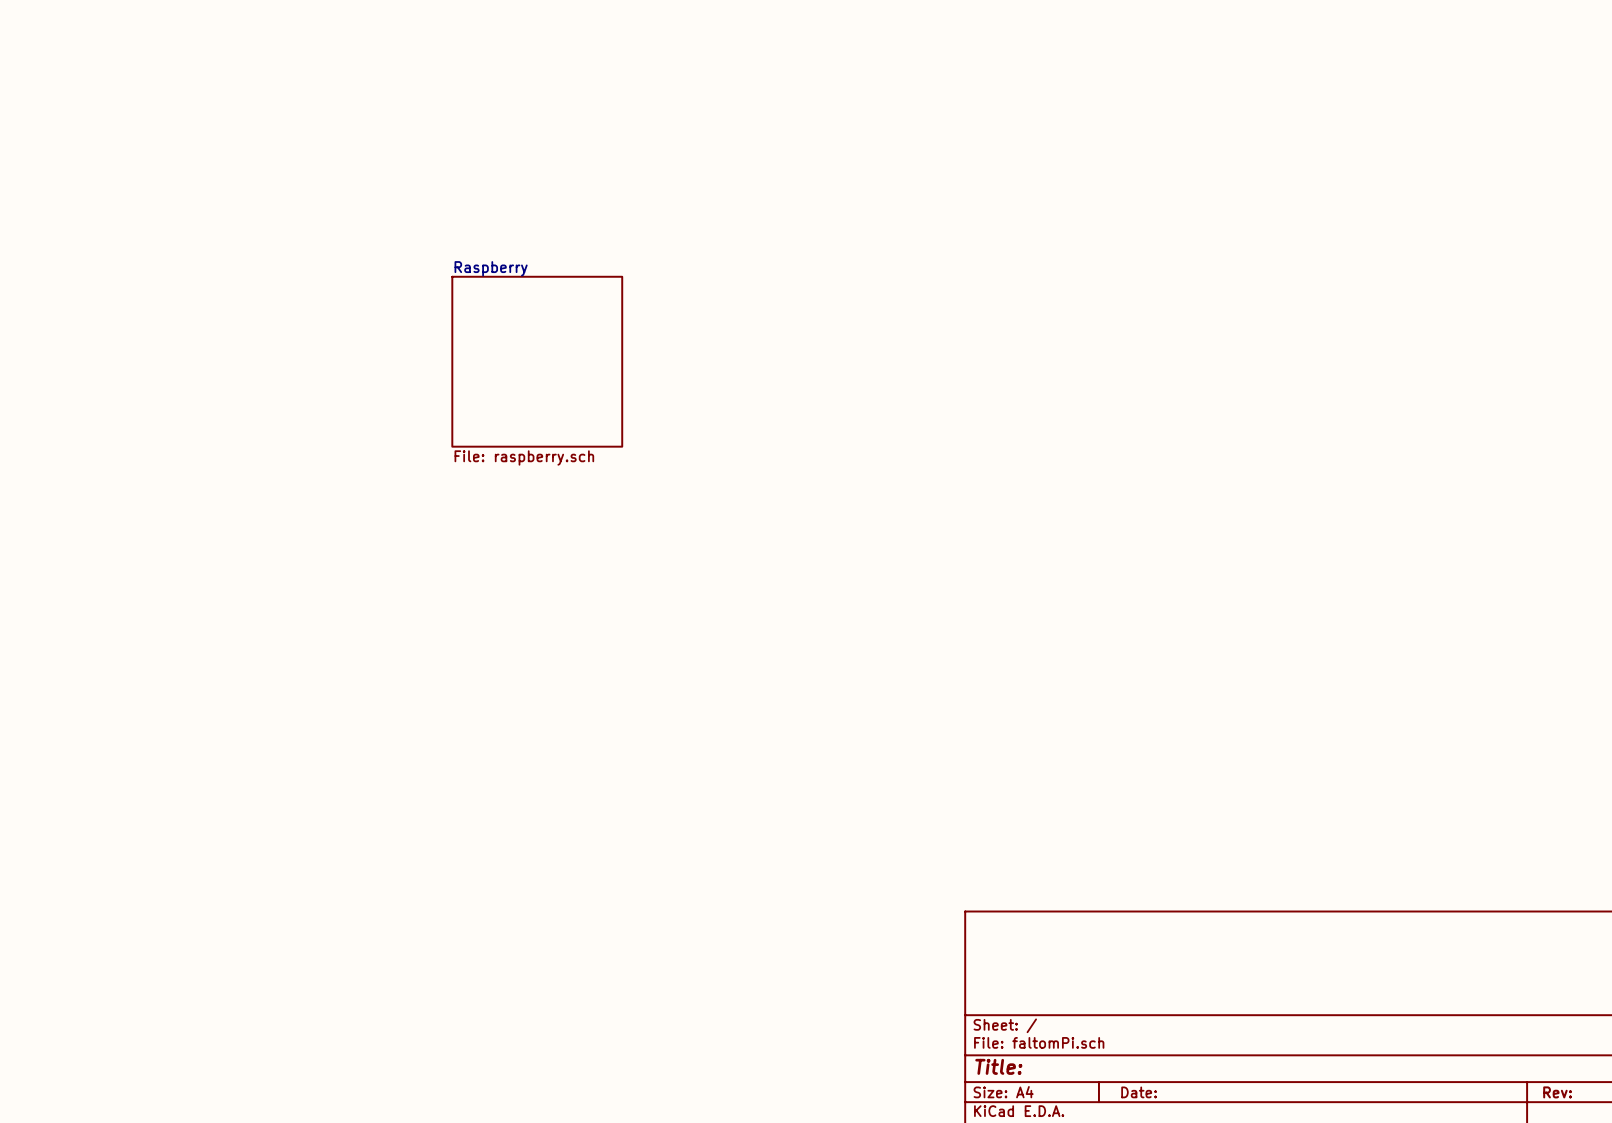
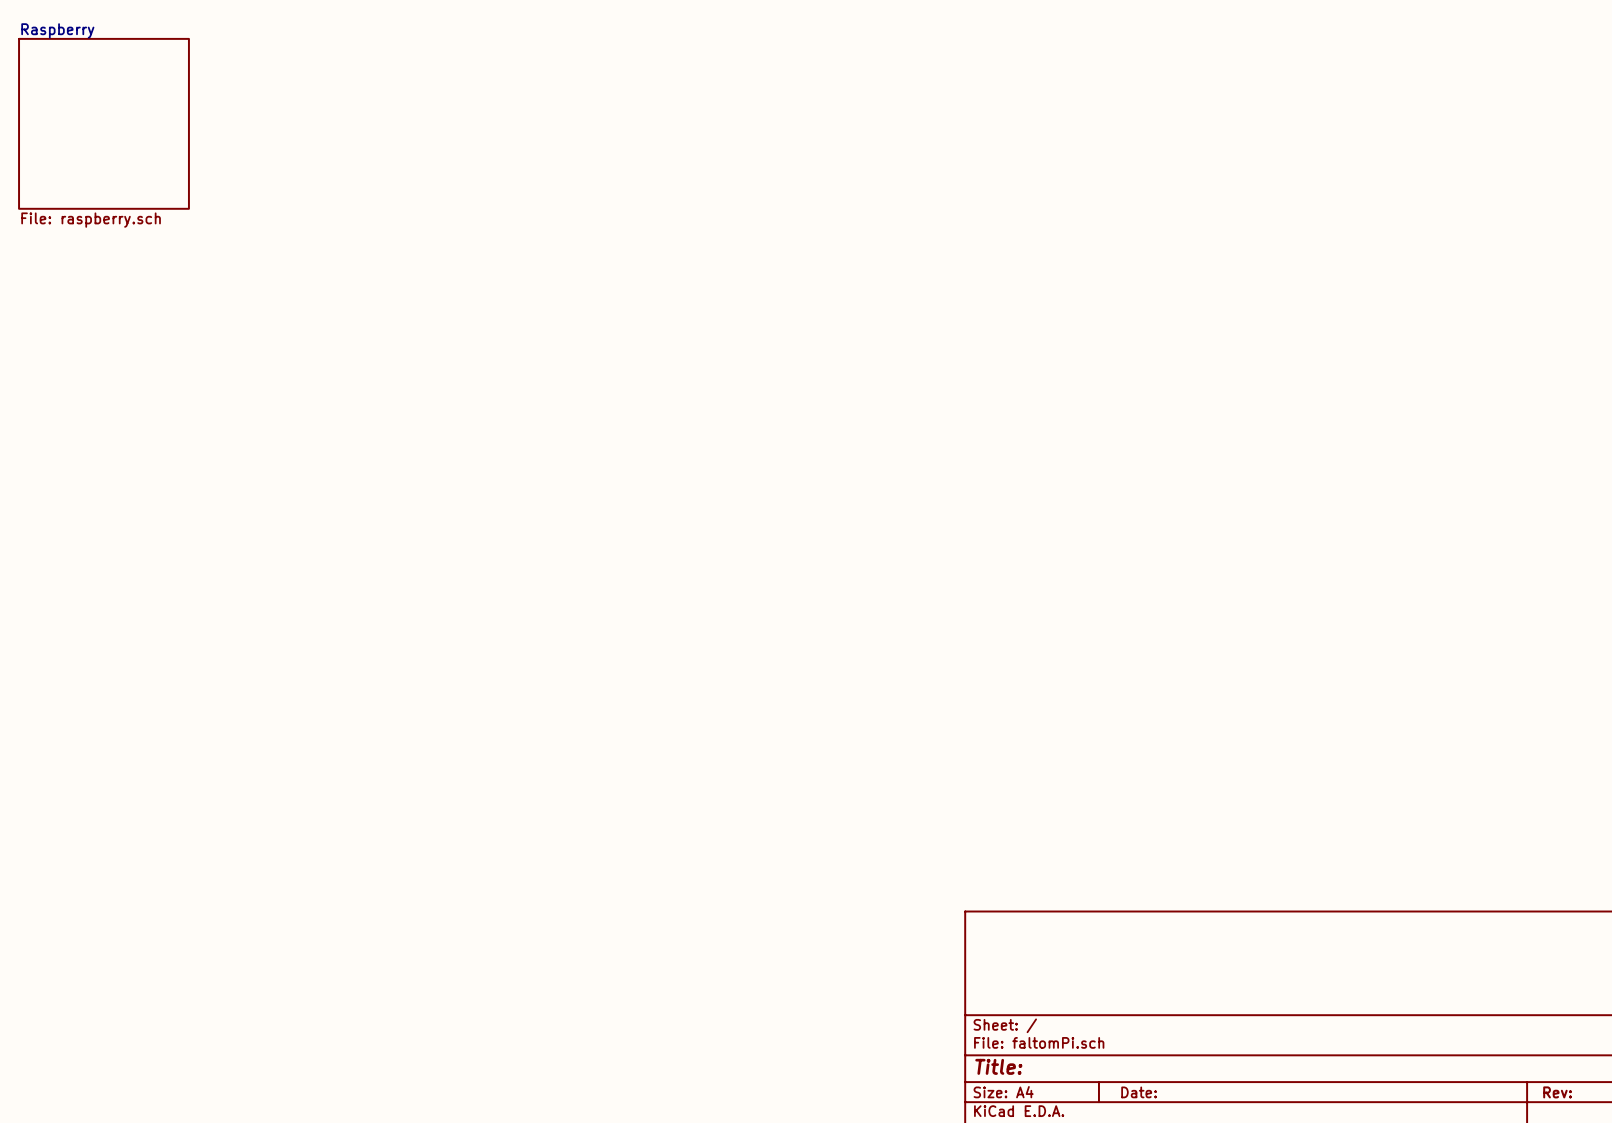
sheet Raspberry: none -> File: raspberry.sch (103, 123)
sheet Raspberry: File: raspberry.sch (537, 361) -> none

